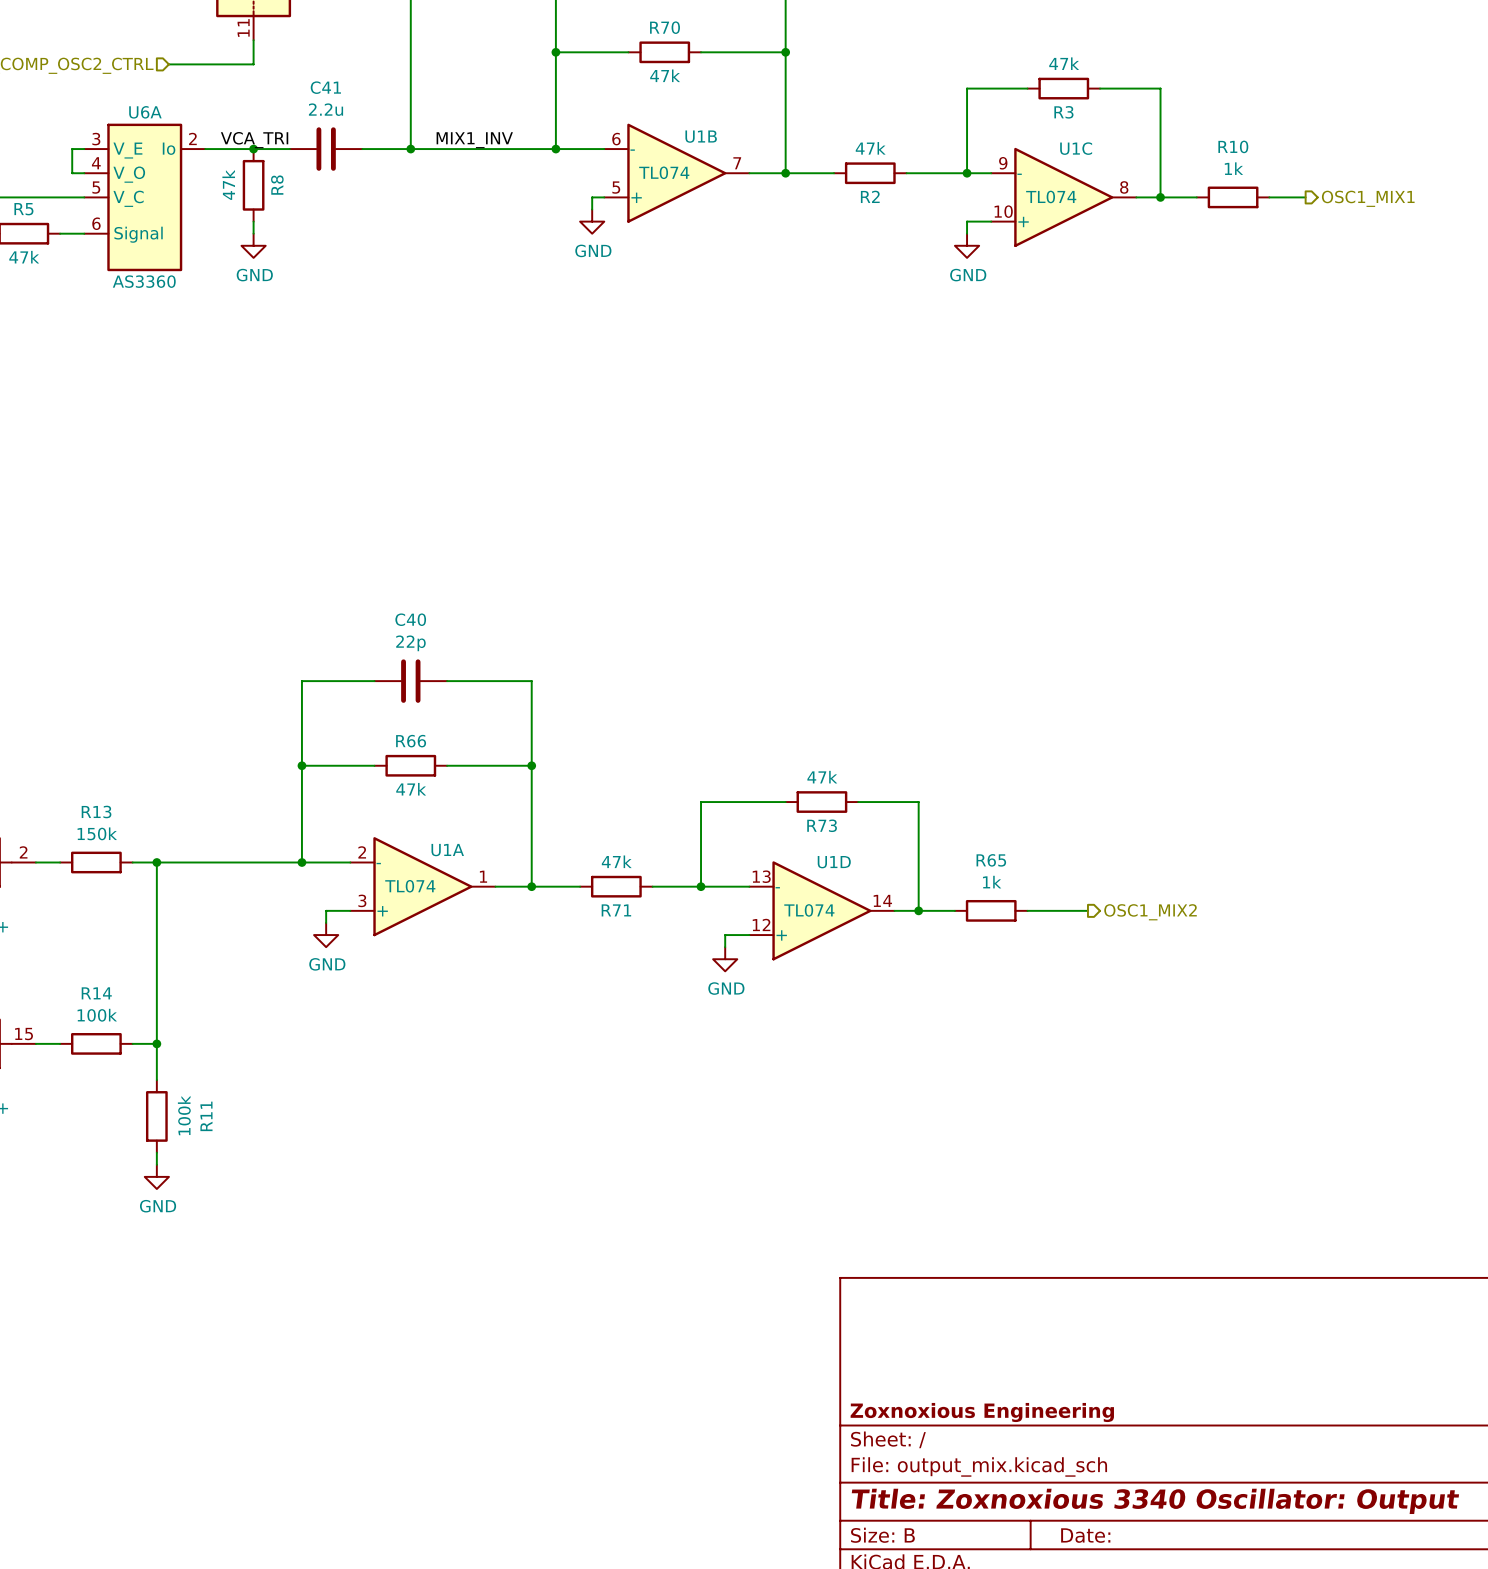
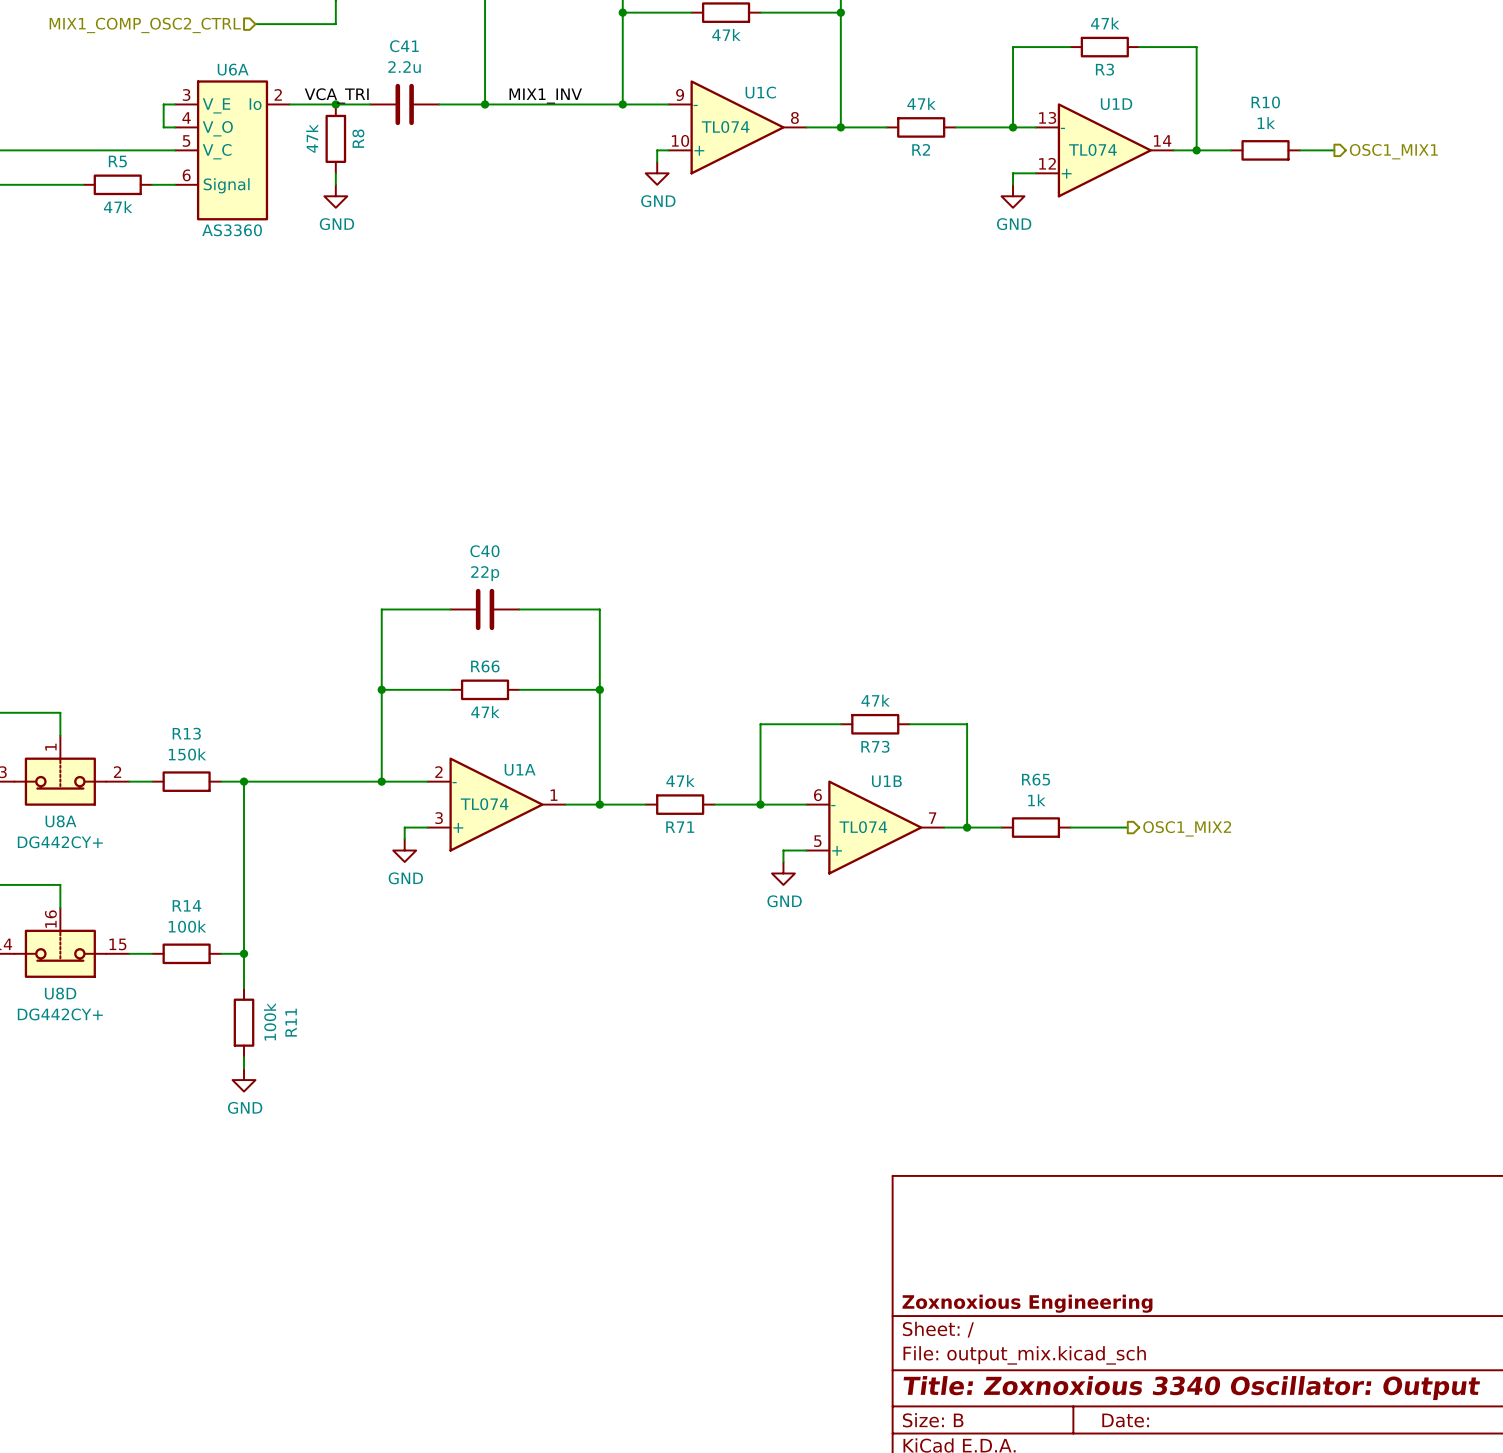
U1B name position: U1B (701, 136) -> U1B (886, 781)
U1C name position: U1C (1076, 148) -> U1C (760, 92)
U1B position: (676, 173) -> (875, 827)
U1C position: (1063, 197) -> (737, 127)
U1D position: (821, 910) -> (1104, 150)

